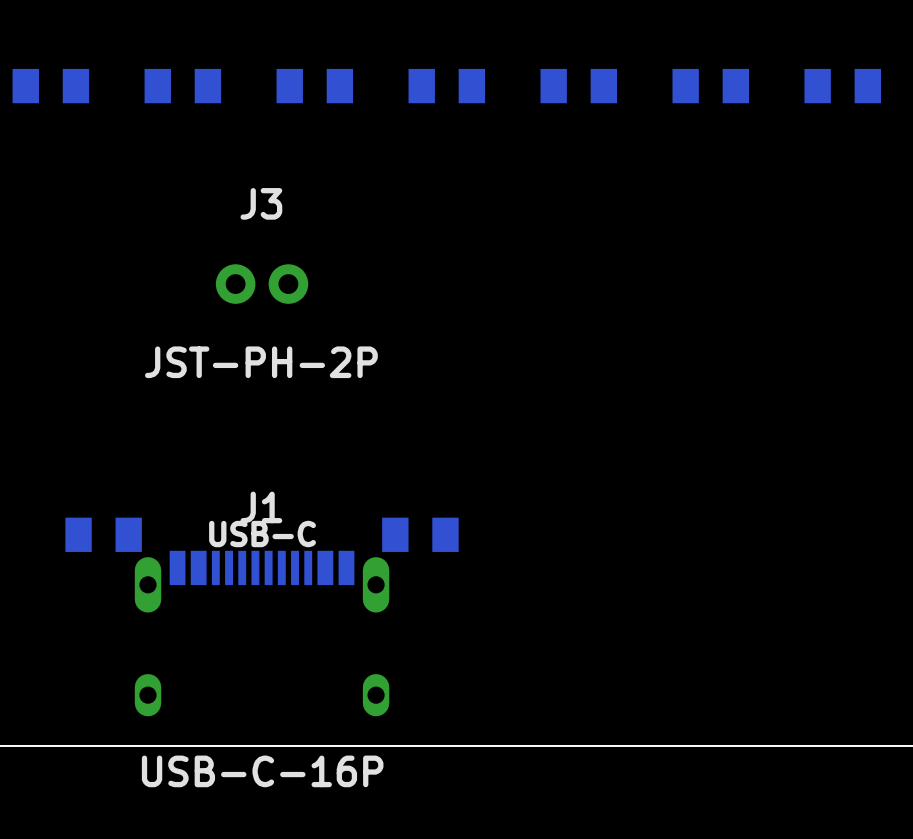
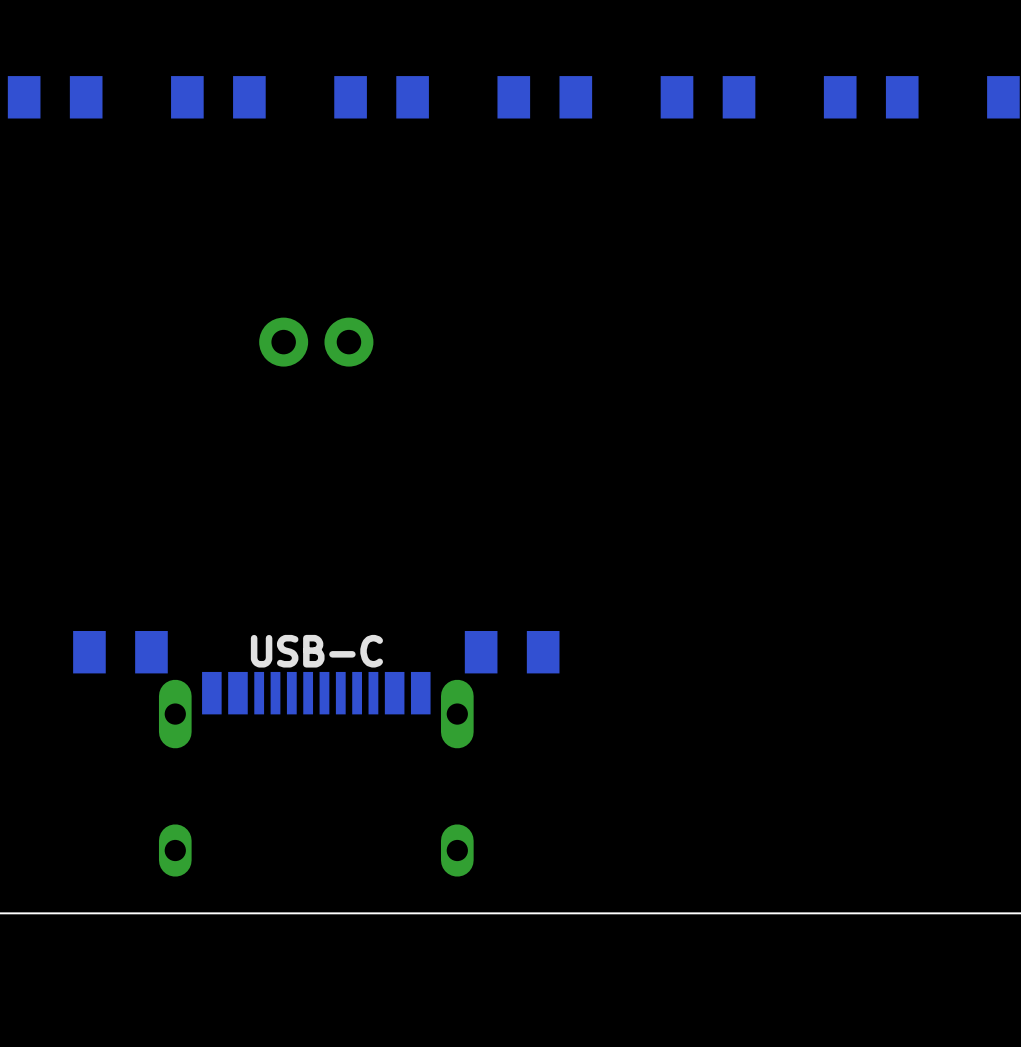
J3 name: J3 (261, 203) -> none
J3 value: JST-PH-2P (261, 362) -> none
J1 name: J1 (261, 507) -> none
J1 value: USB-C-16P (262, 771) -> none

